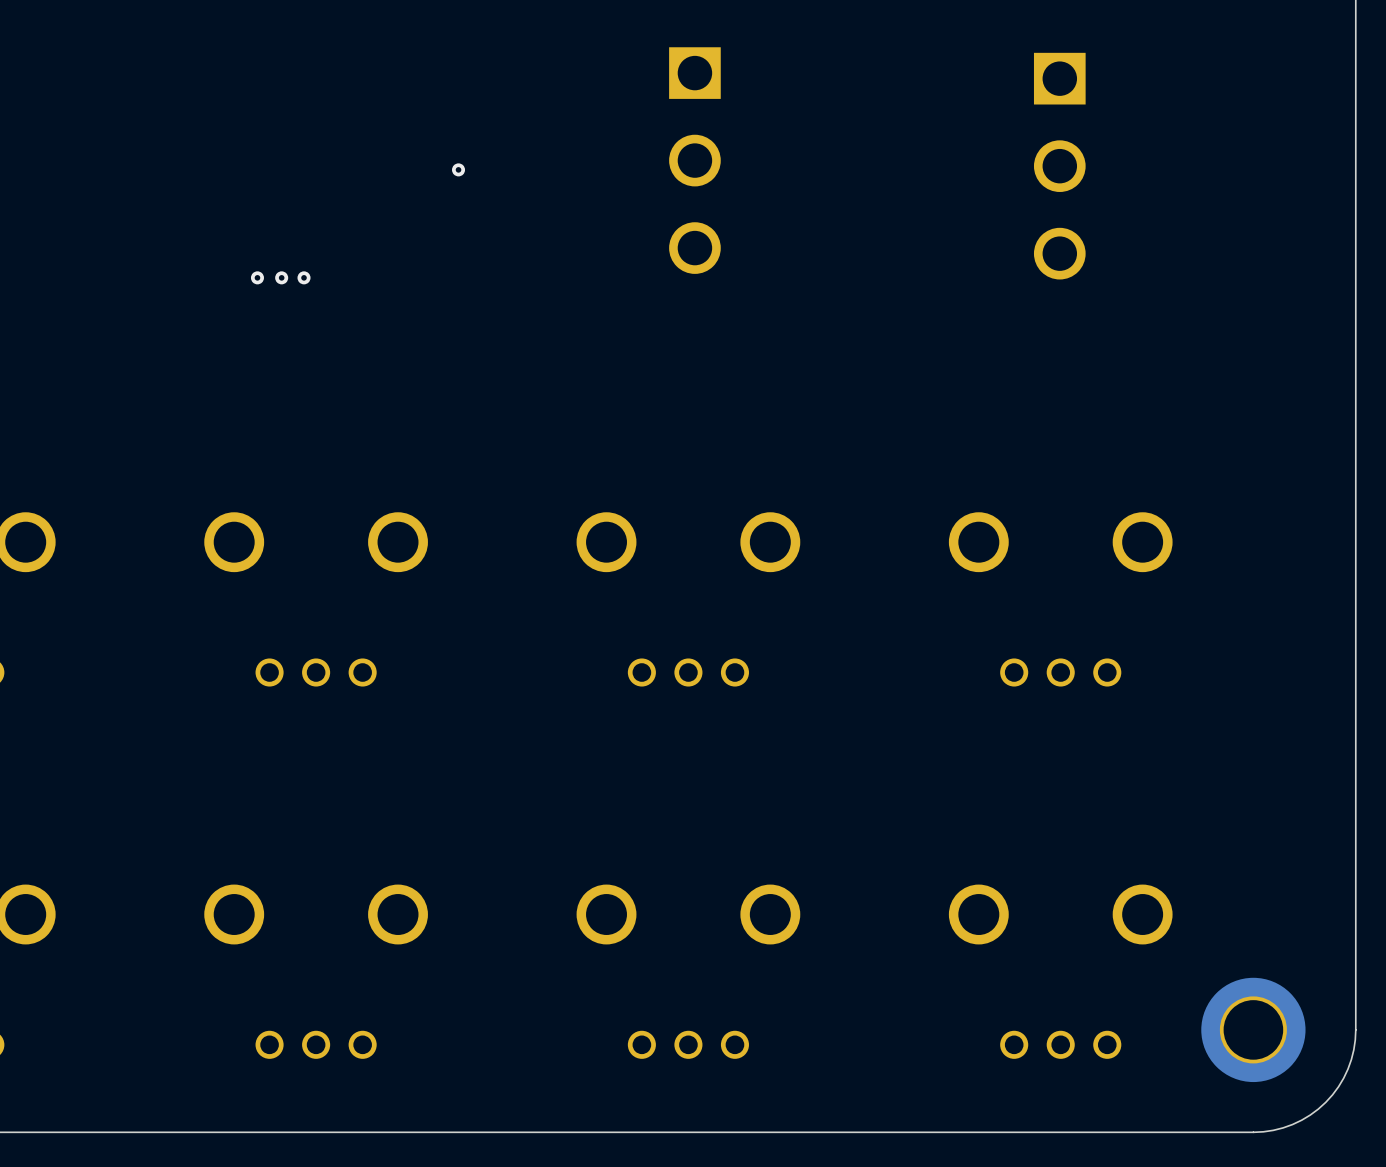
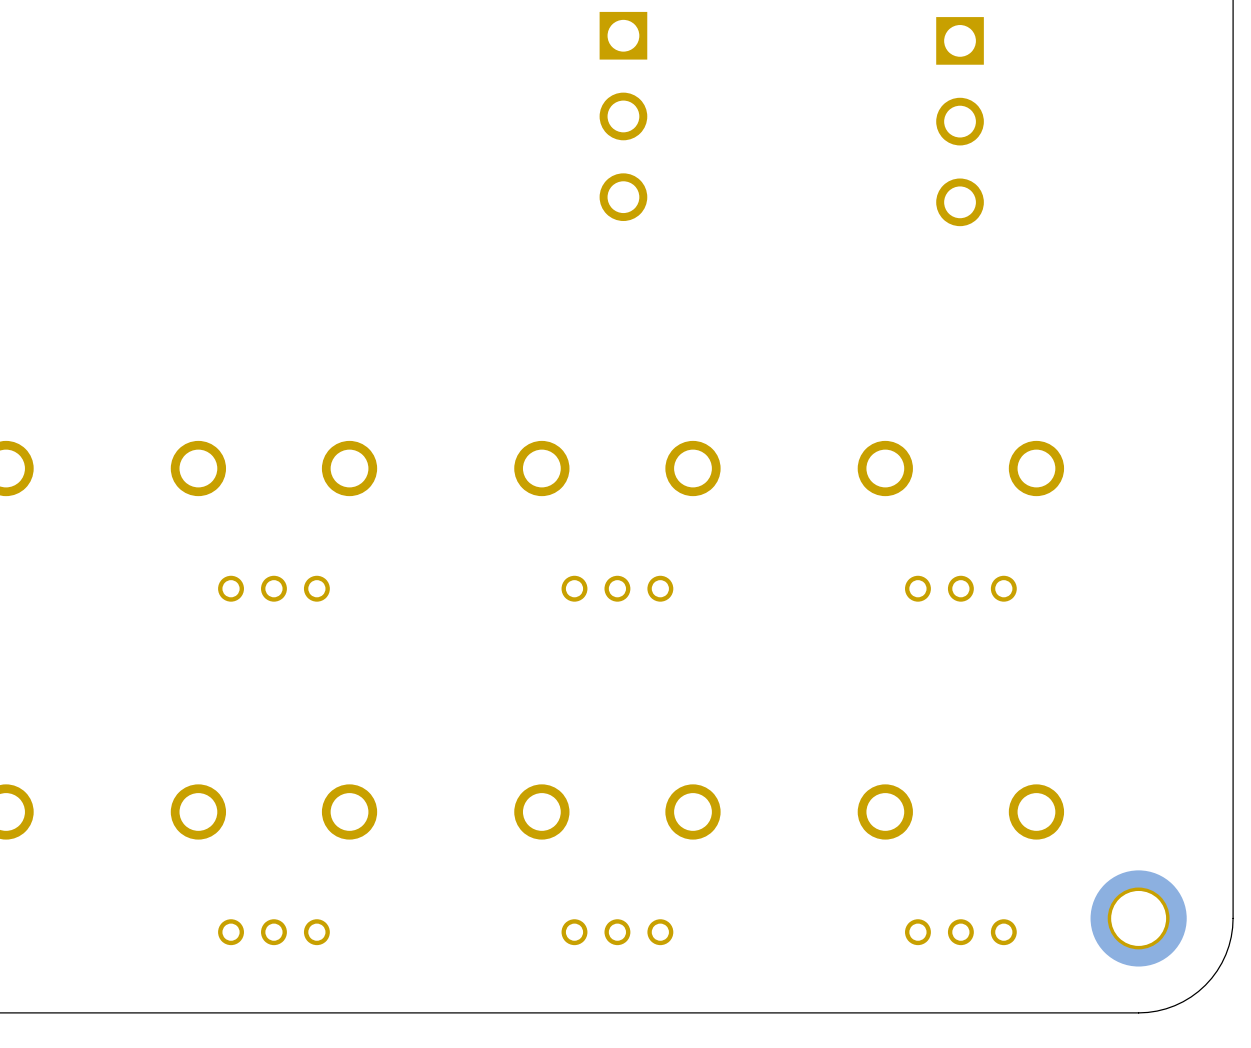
via: (458, 169) -> none
via: (257, 277) -> none
via: (281, 277) -> none
via: (304, 277) -> none

